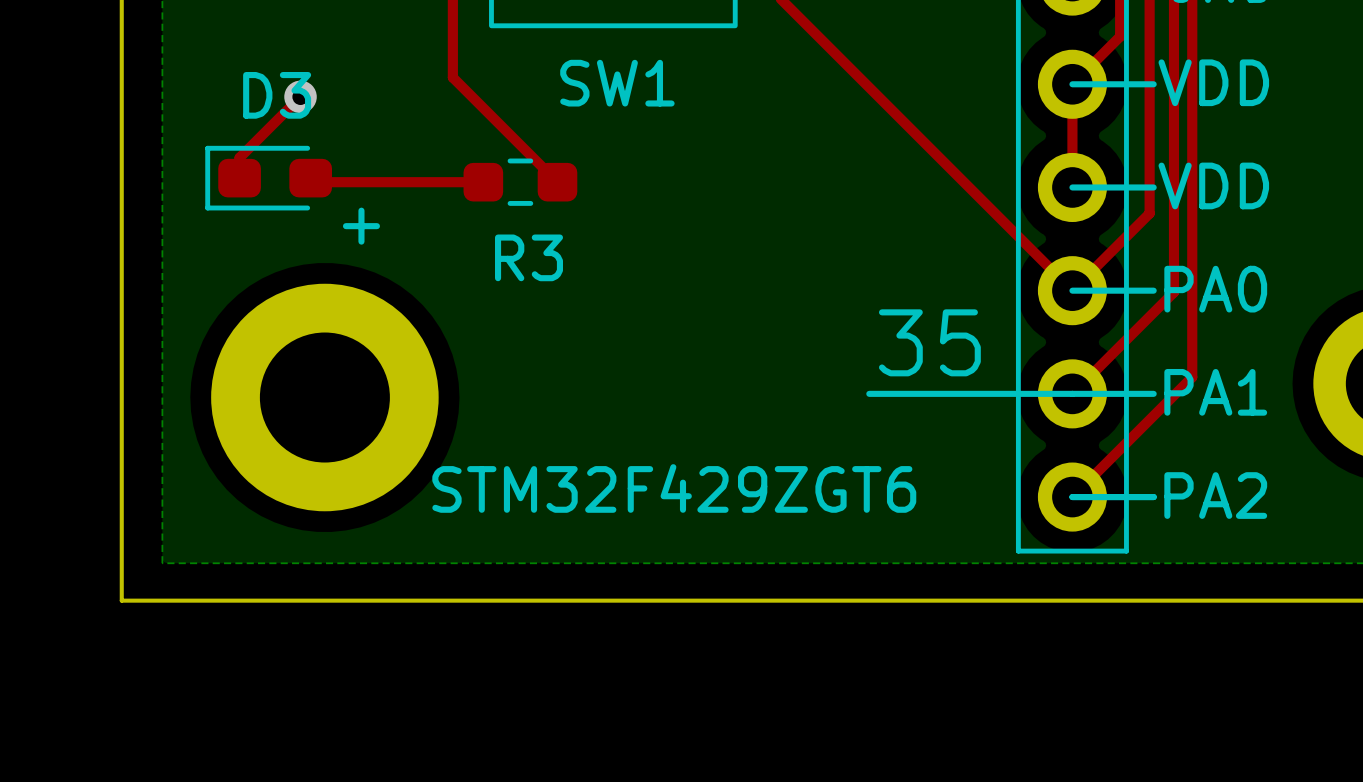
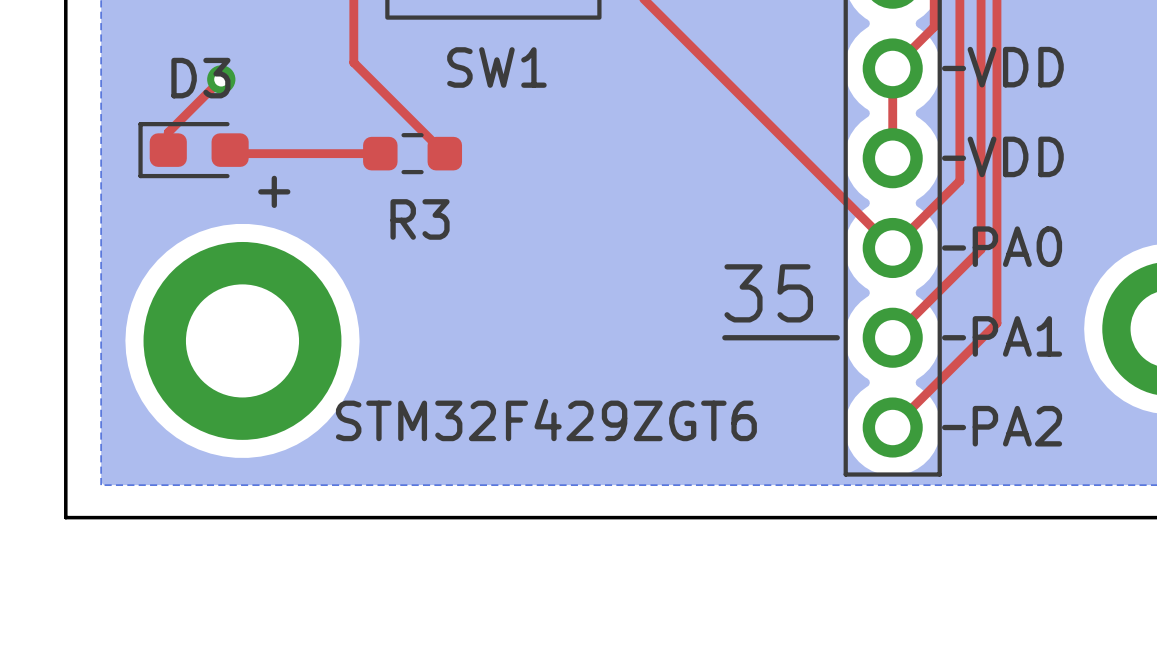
line: (1072, 84) (1132, 84) -> none
line: (1072, 187) (1132, 187) -> none
line: (1072, 290) (1132, 290) -> none
line: (869, 393) (879, 393) -> none
line: (1008, 393) (1132, 393) -> none
line: (1072, 497) (1132, 497) -> none

